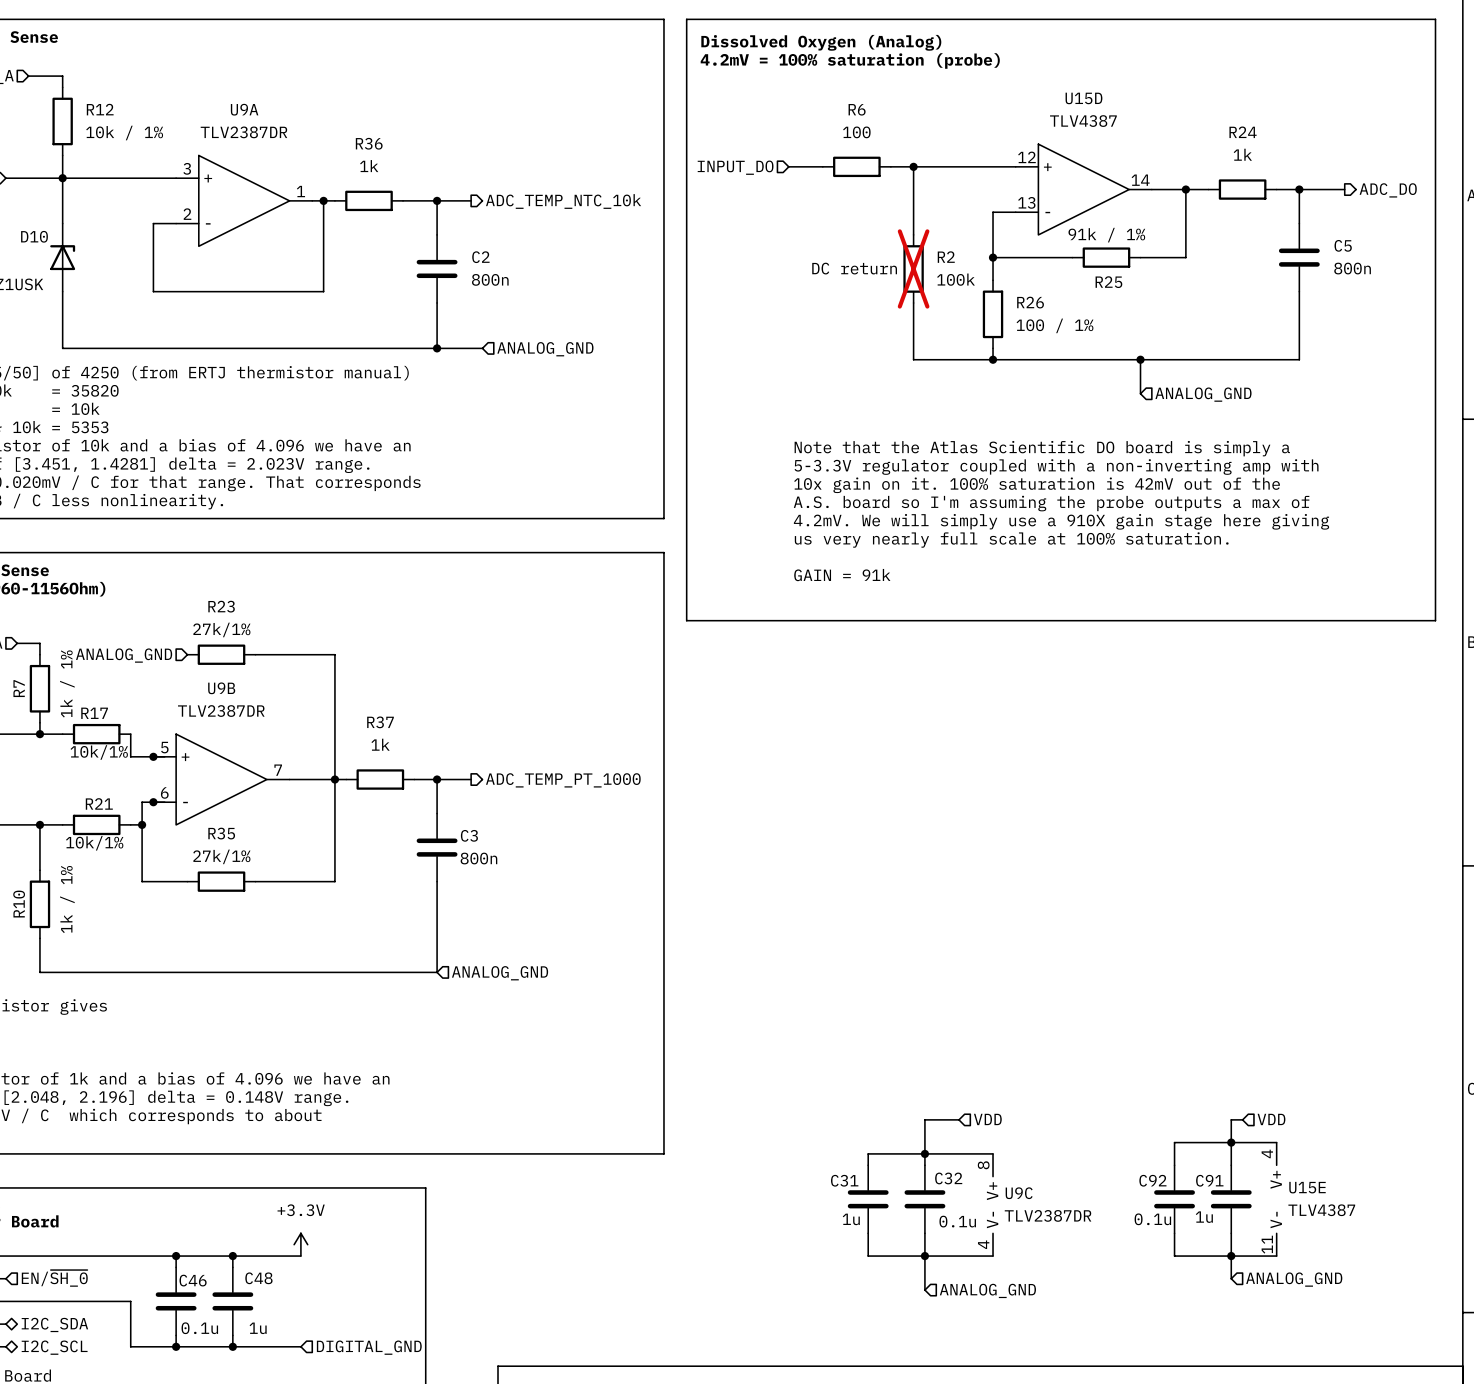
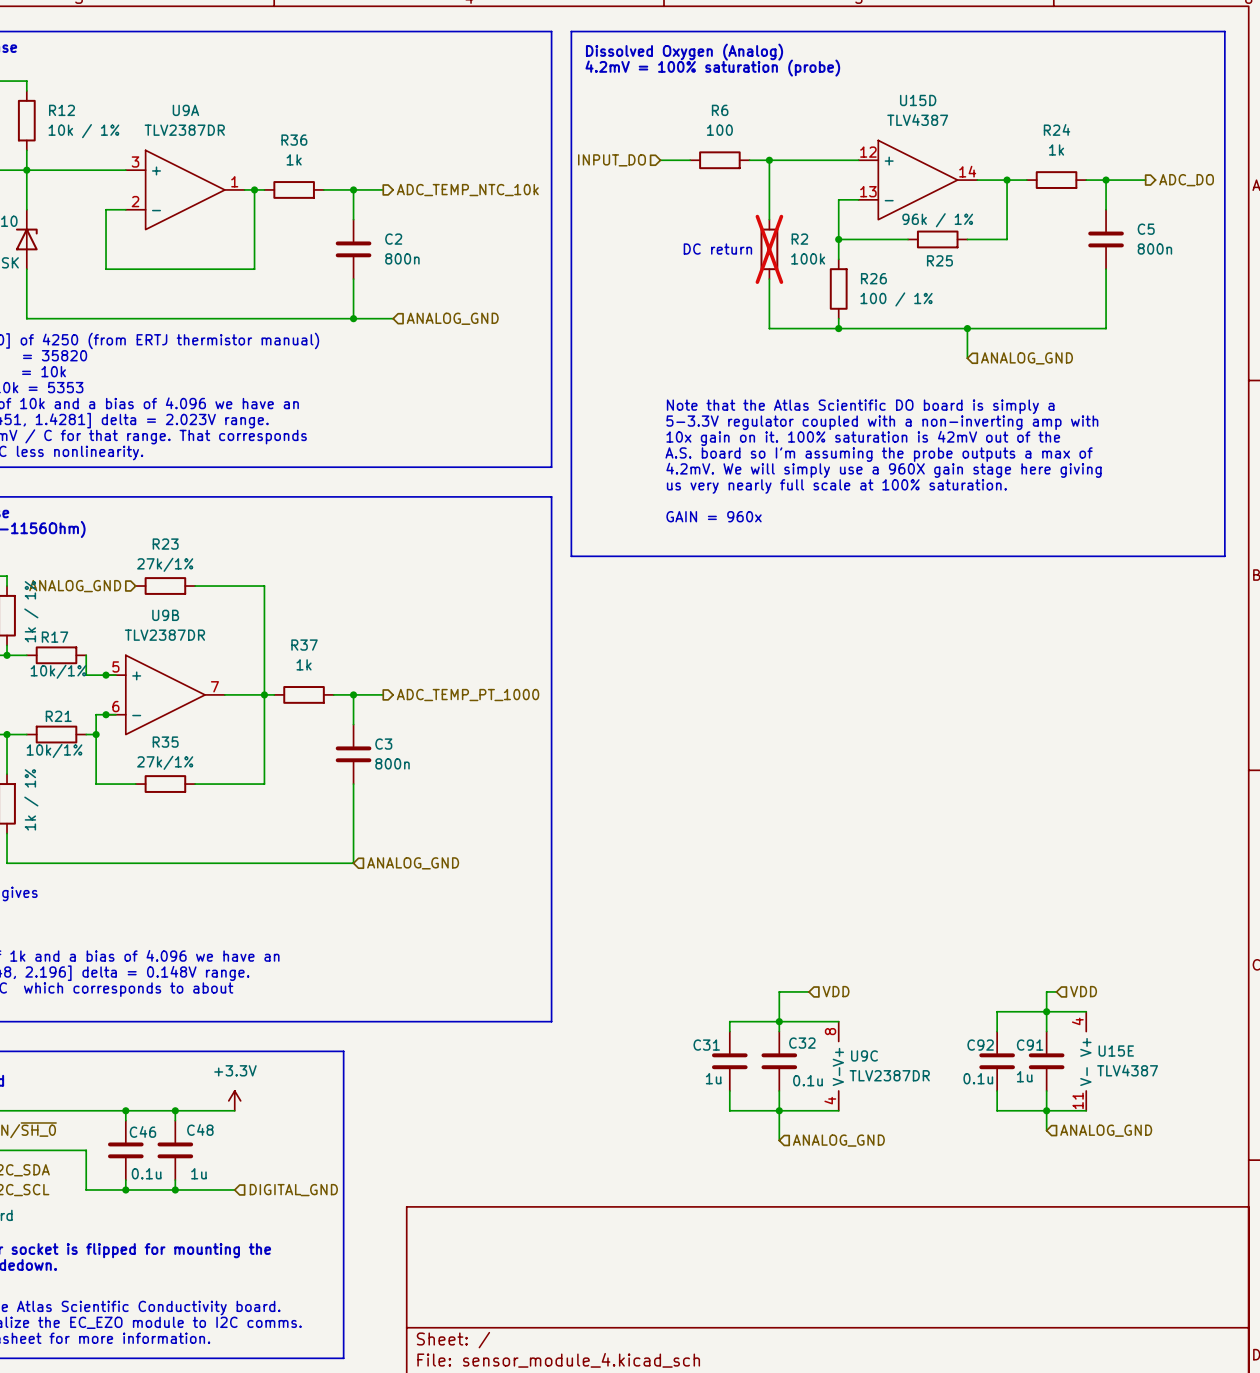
R25 value: 91k / 1% (1106, 235) -> 96k / 1% (937, 220)
text: 4.2mV. We will simply use a 910X gain stage here giving (1061, 521) -> 4.2mV. We will simply use a 960X gain stage here giving (884, 470)
text: GAIN = 91k (842, 575) -> GAIN = 960x (714, 516)

